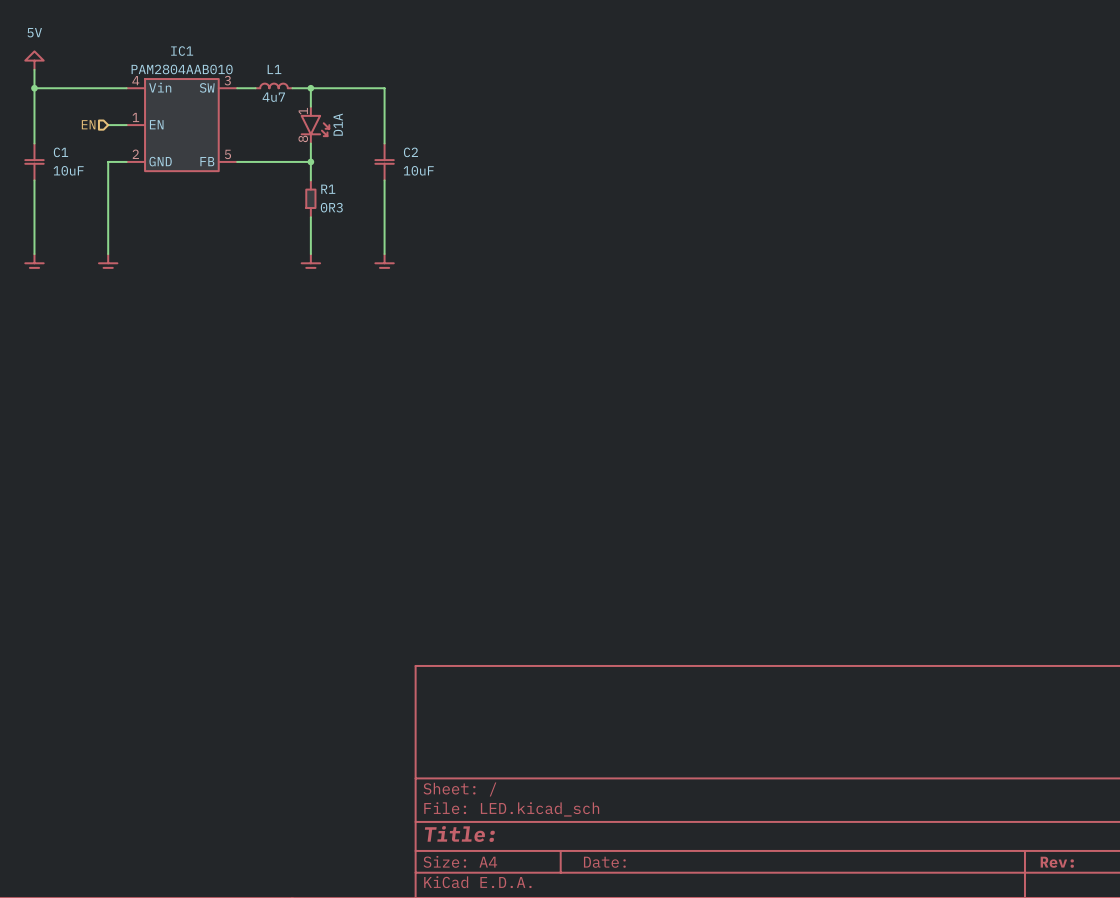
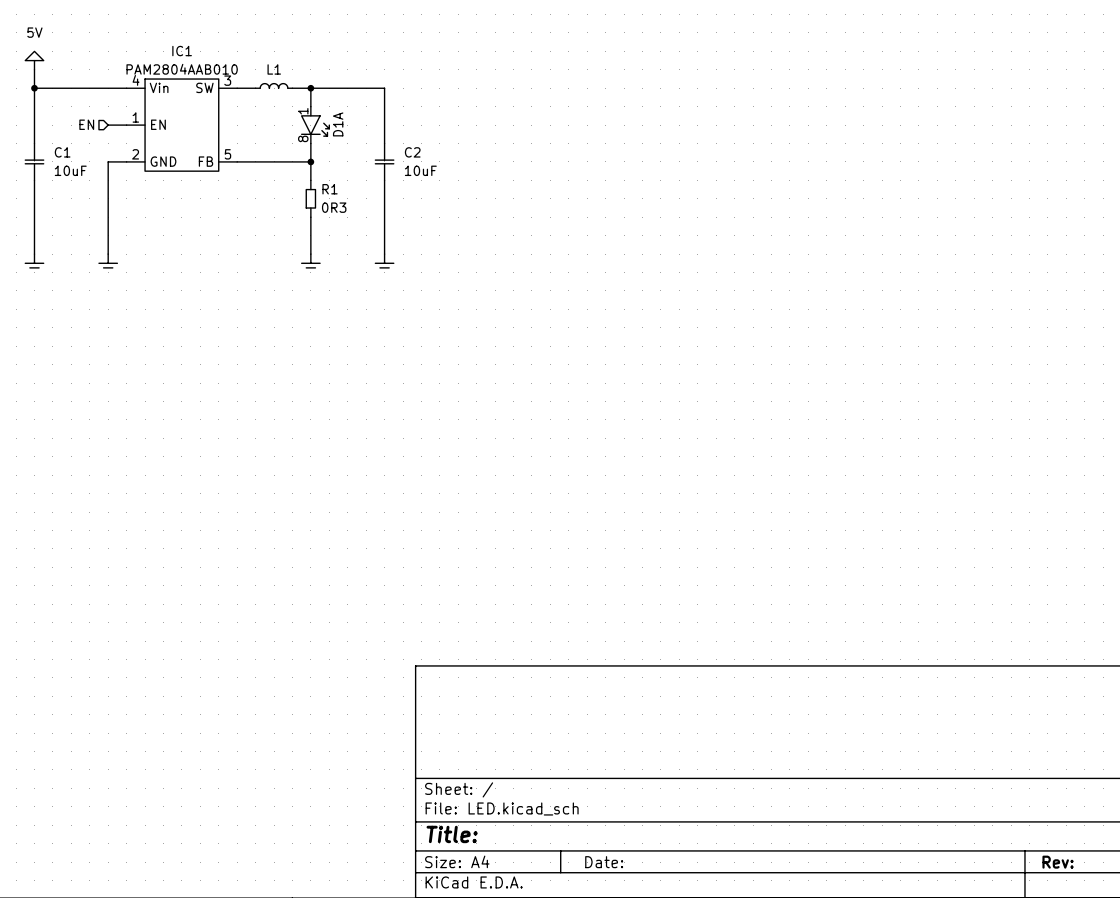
L1 value: 4u7 (273, 97) -> none

